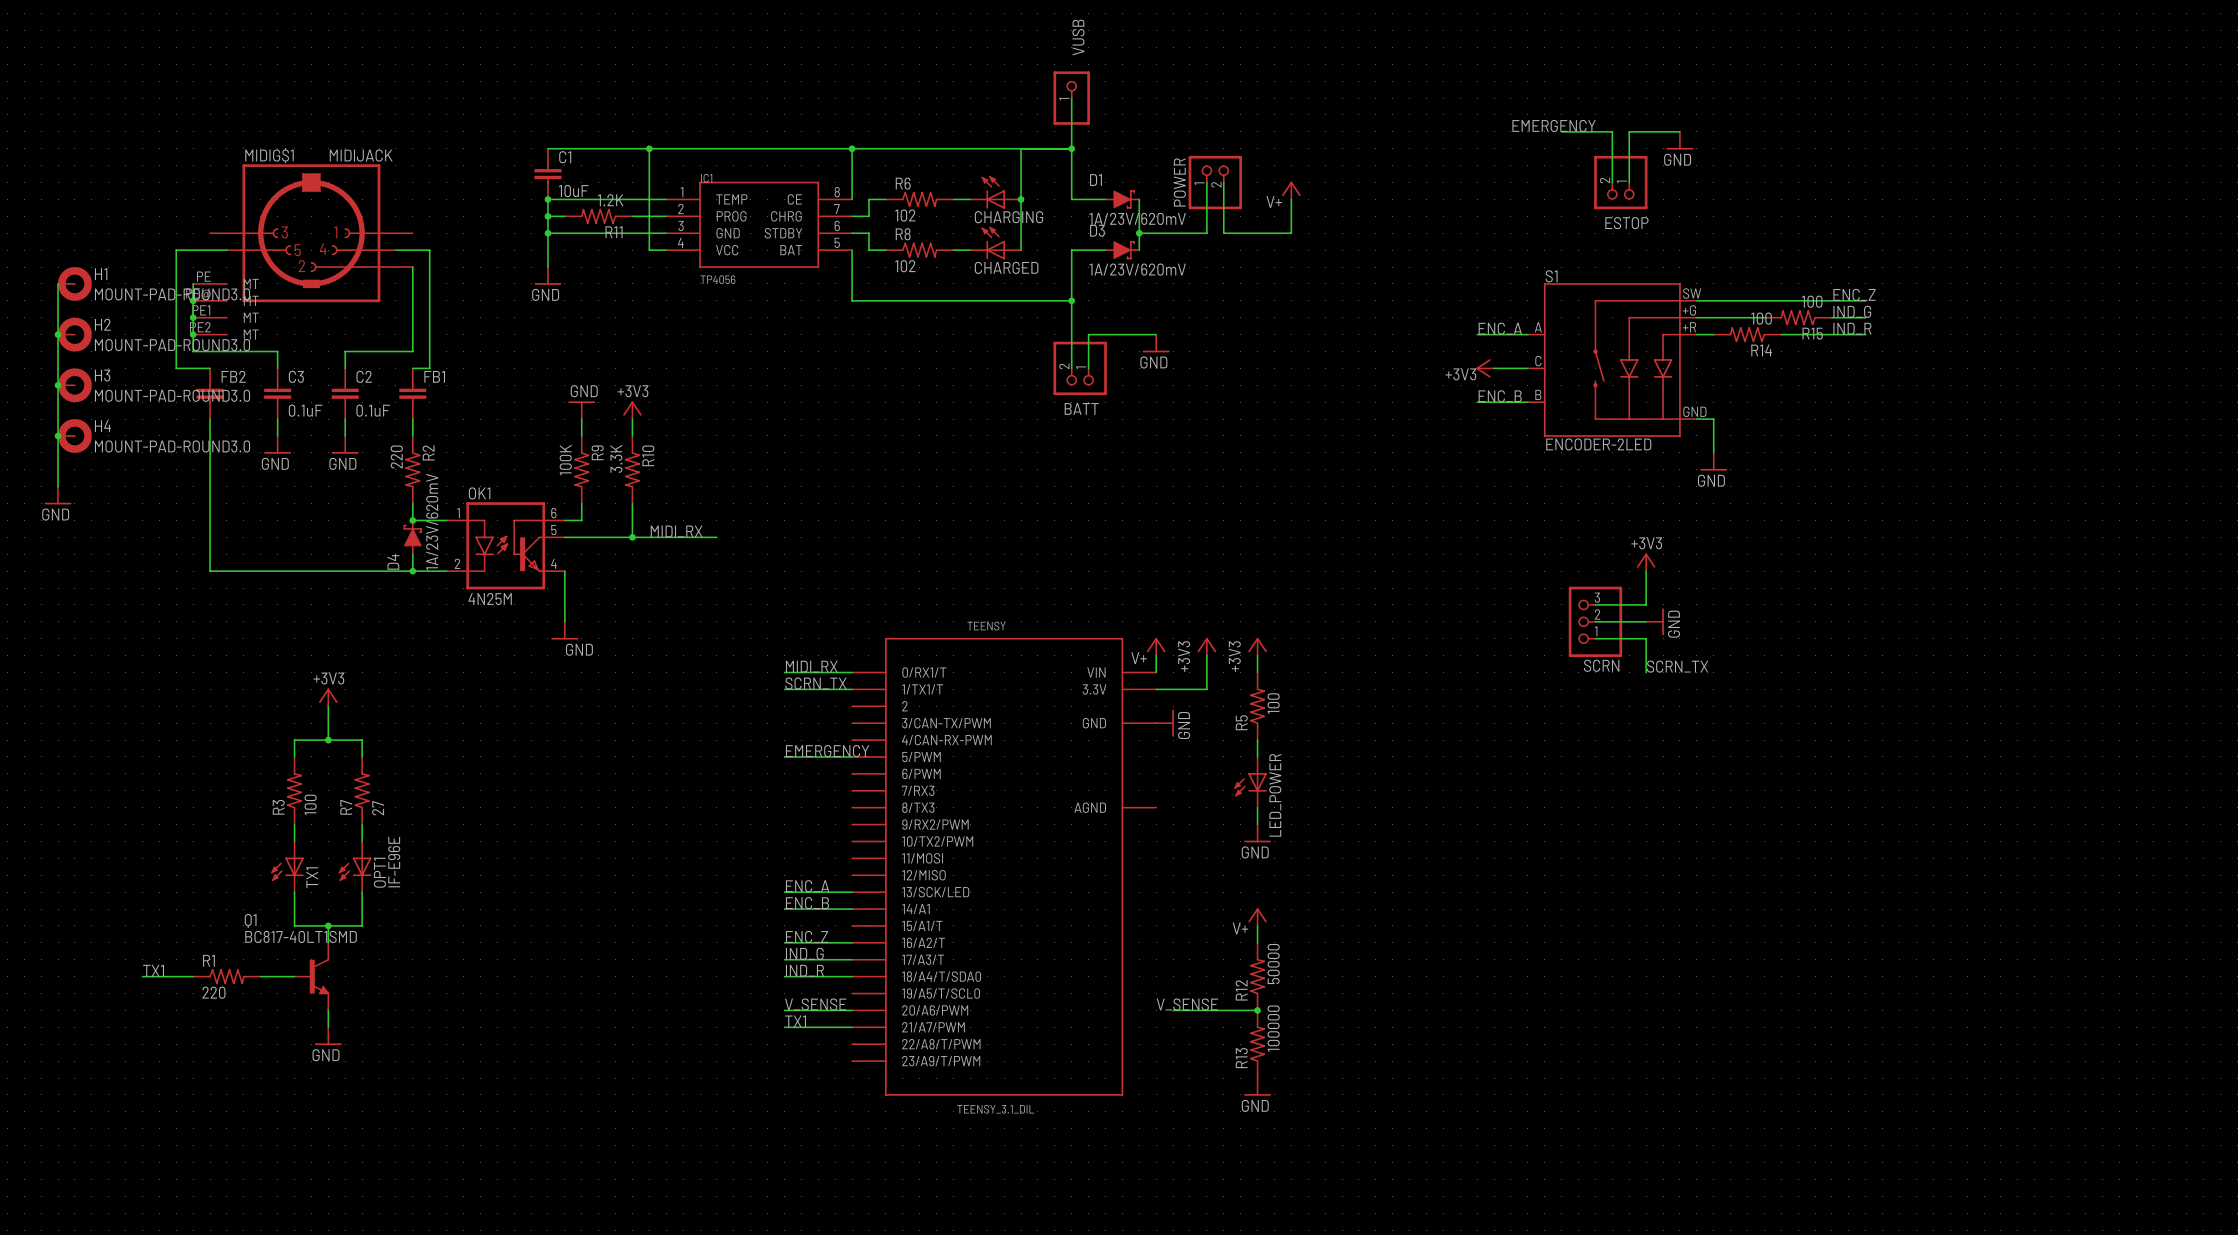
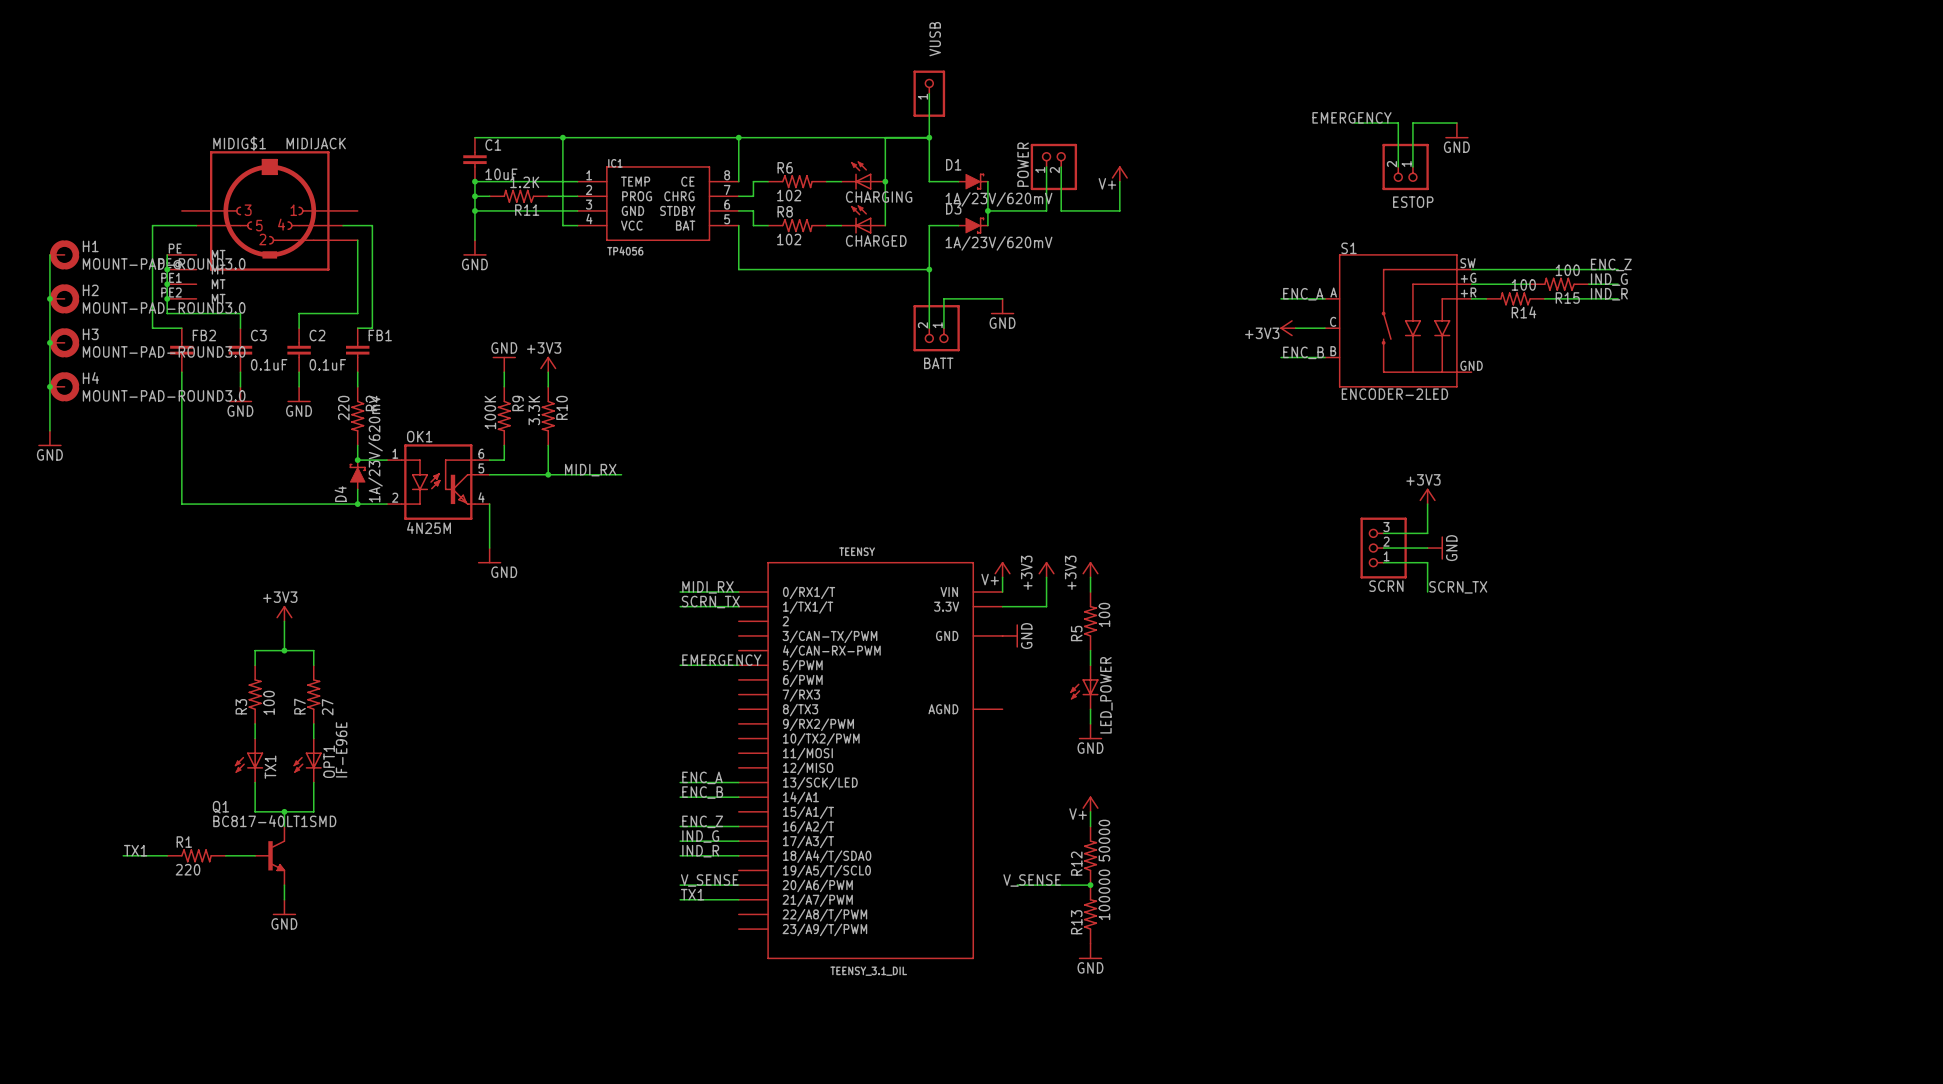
wire: (1696, 419) (1713, 419) (1713, 452) -> none
power symbol: GND (1713, 461) -> none

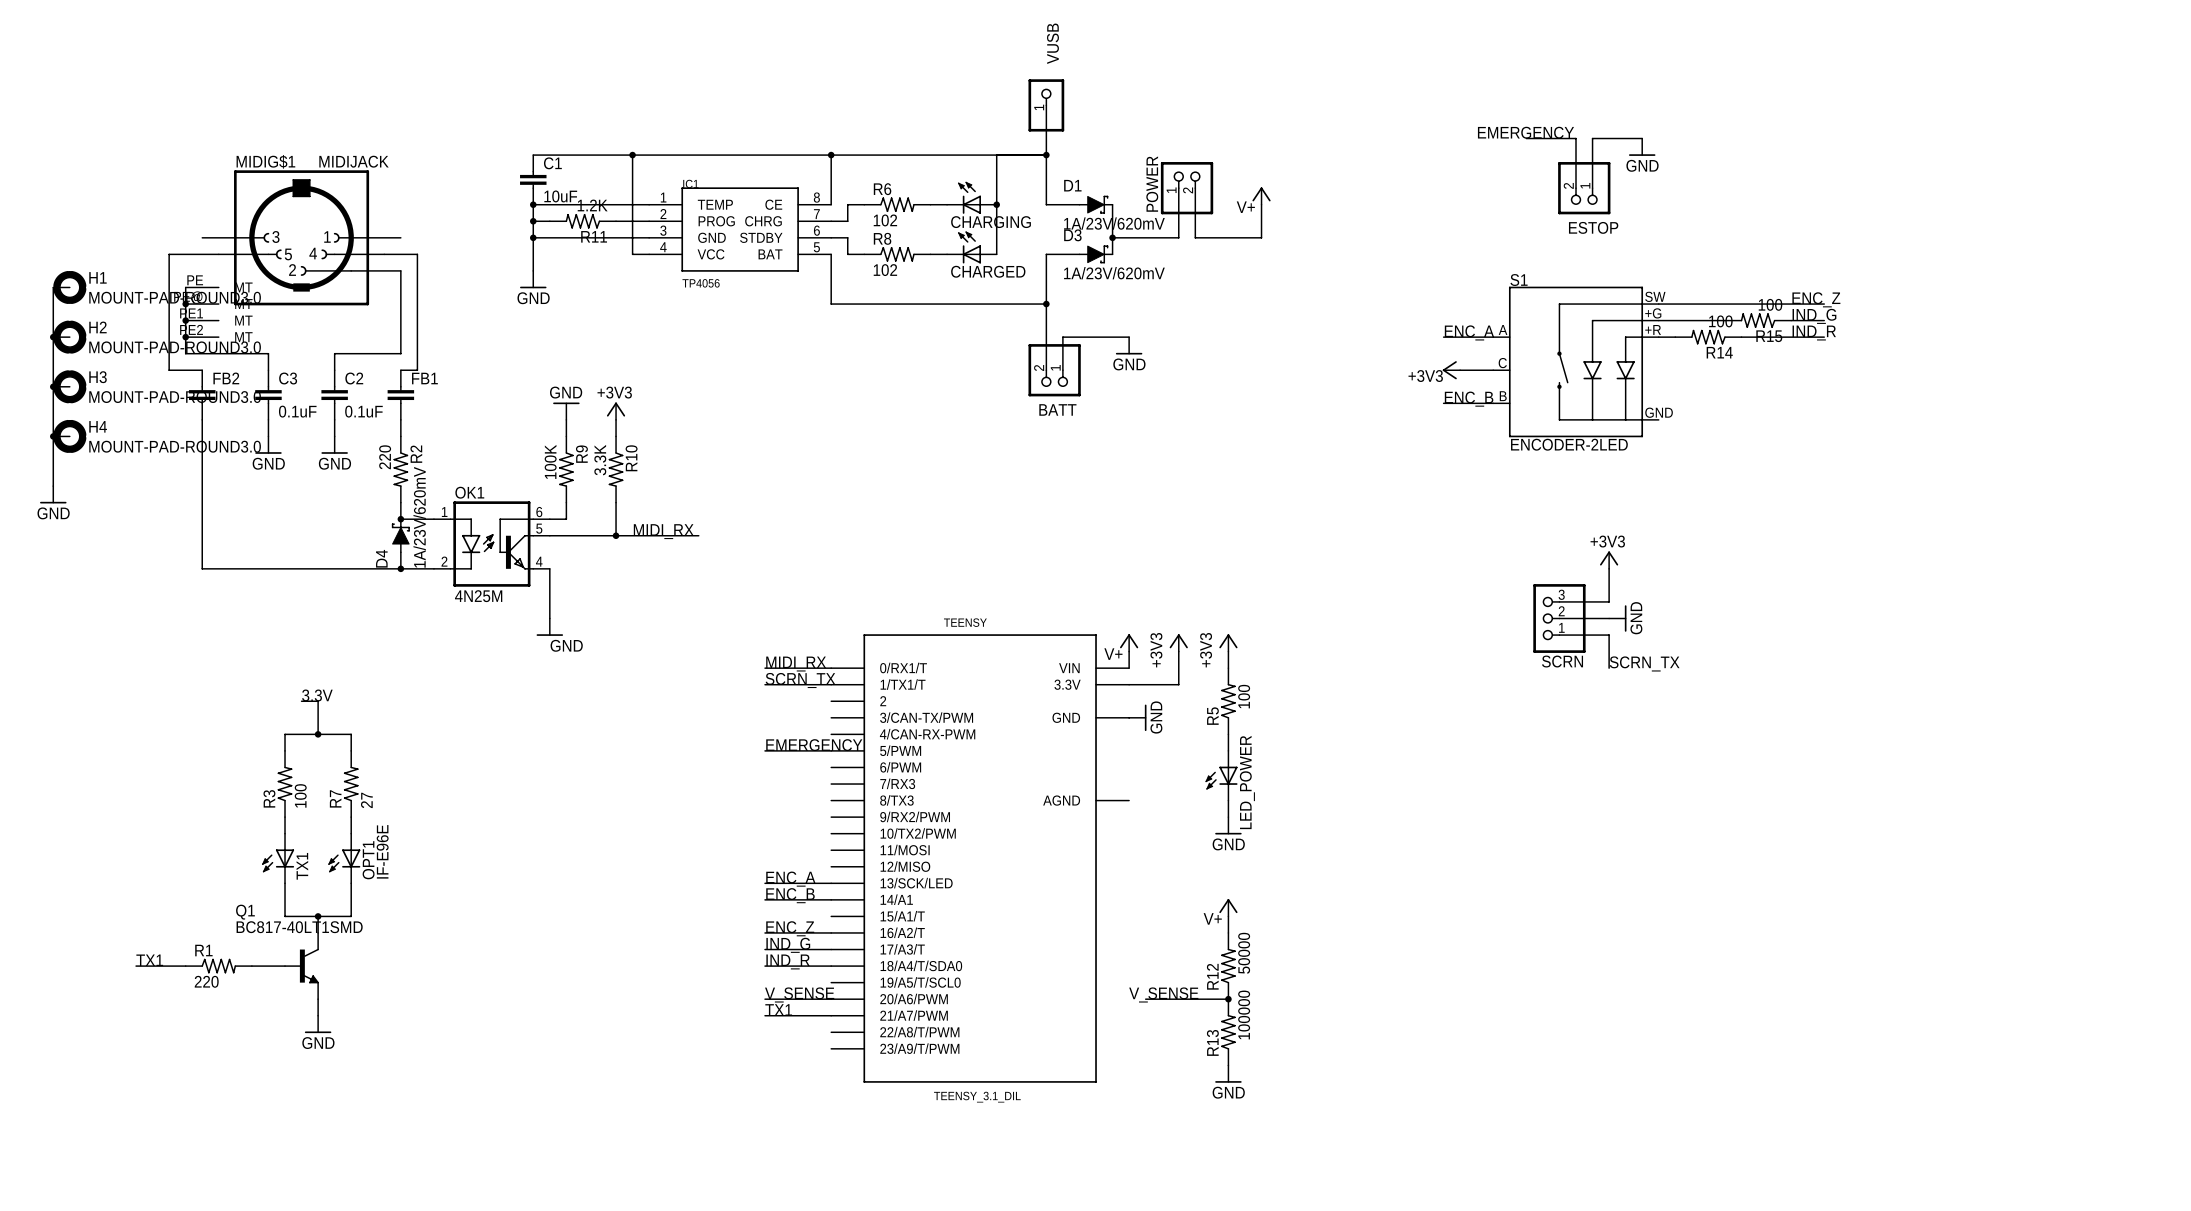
power symbol: +3V3 (284, 613) -> none
label: none -> 3.3V (317, 695)
wire: none -> (301, 701) (318, 701)

